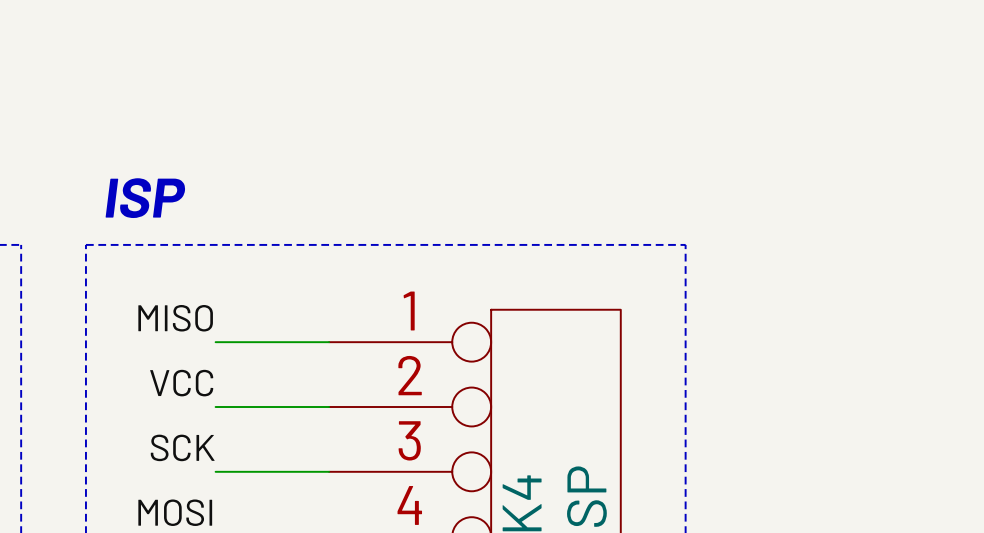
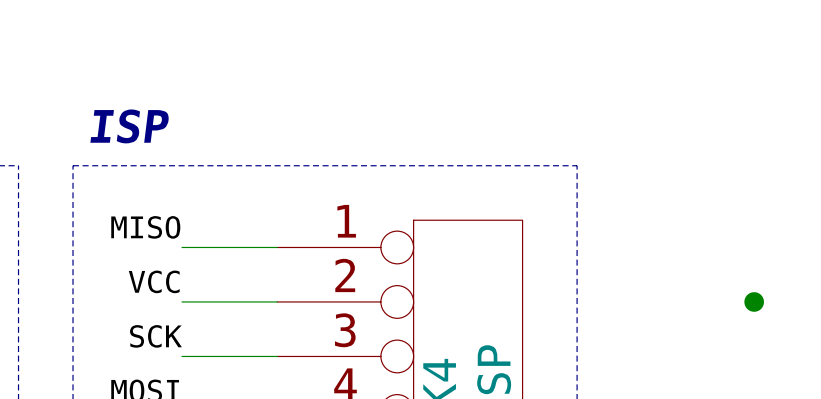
junction: none -> (754, 301)

